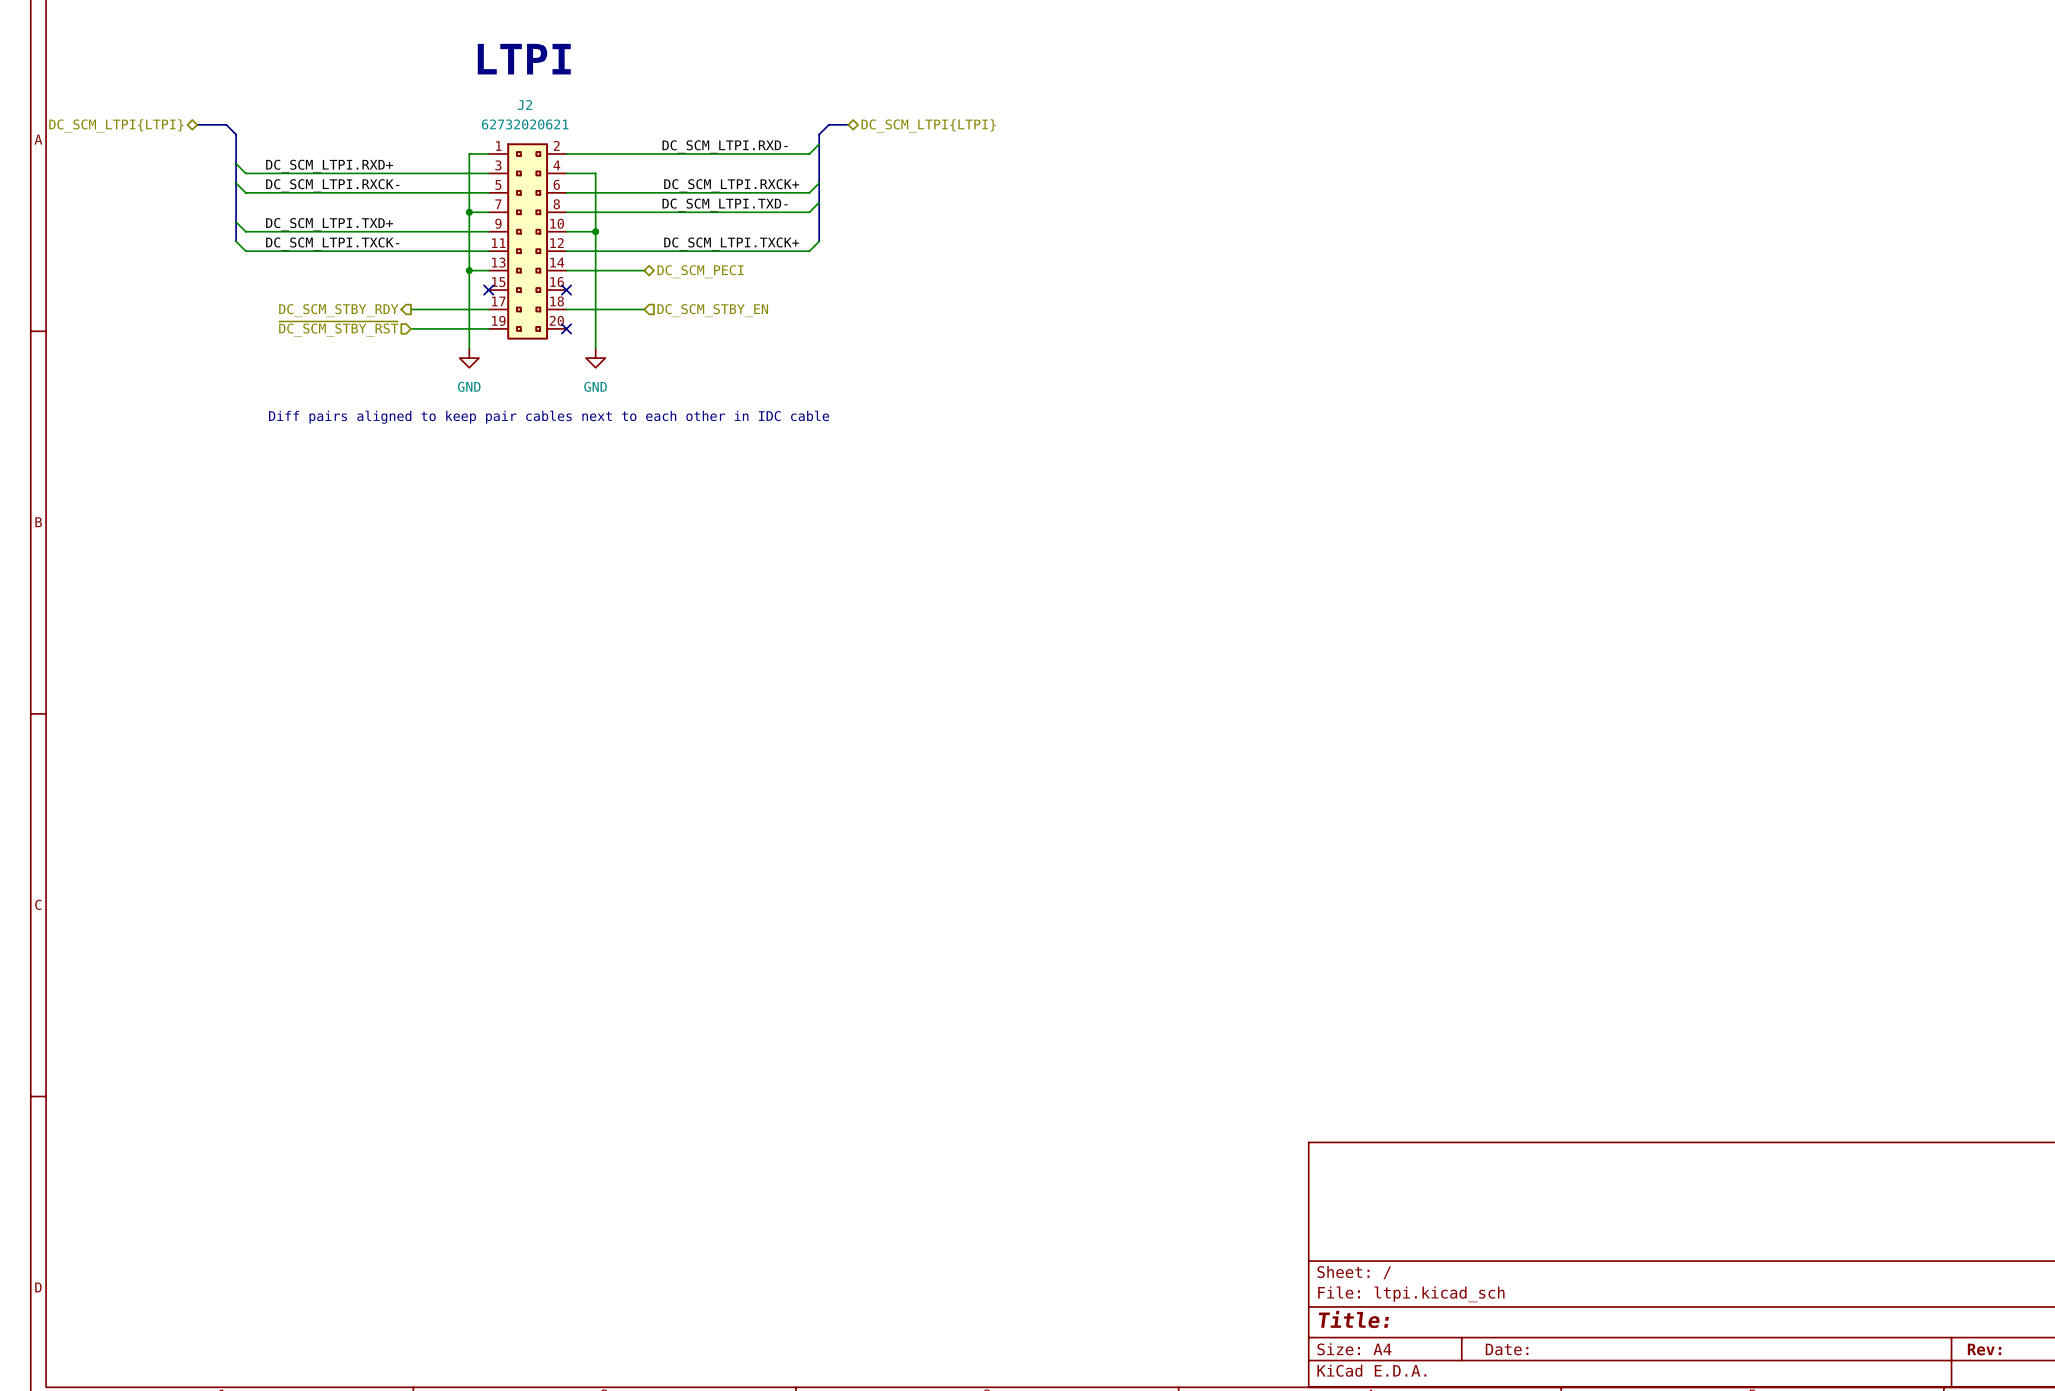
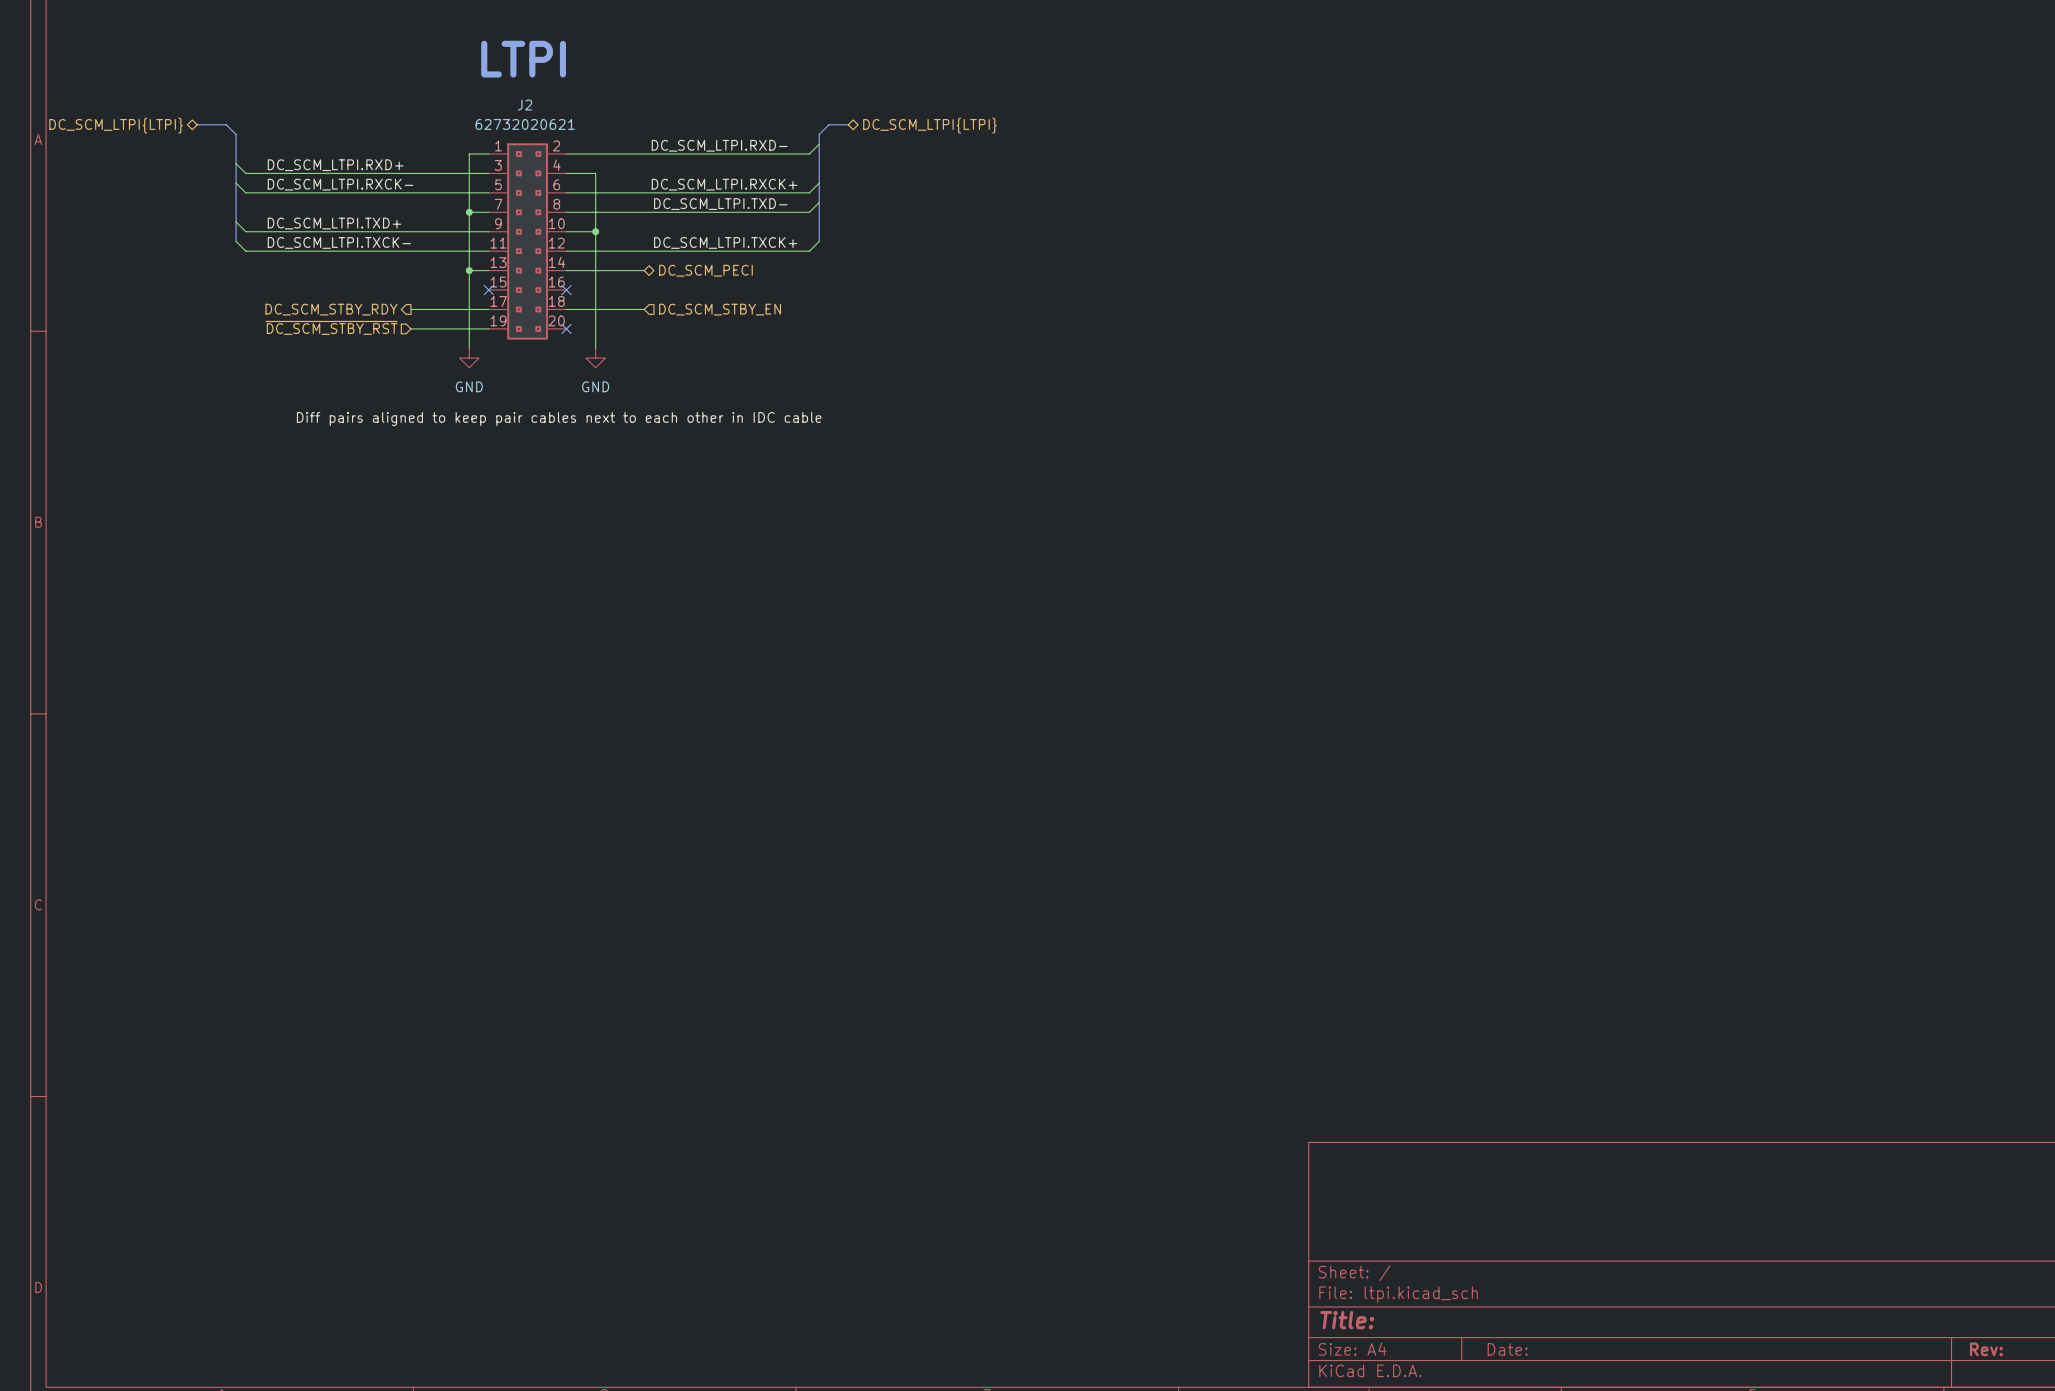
text: Diff pairs aligned to keep pair cables next to each other in IDC cable (549, 417) -> none
label: none -> Diff pairs aligned to keep pair cables next to each other in IDC cable (559, 419)

